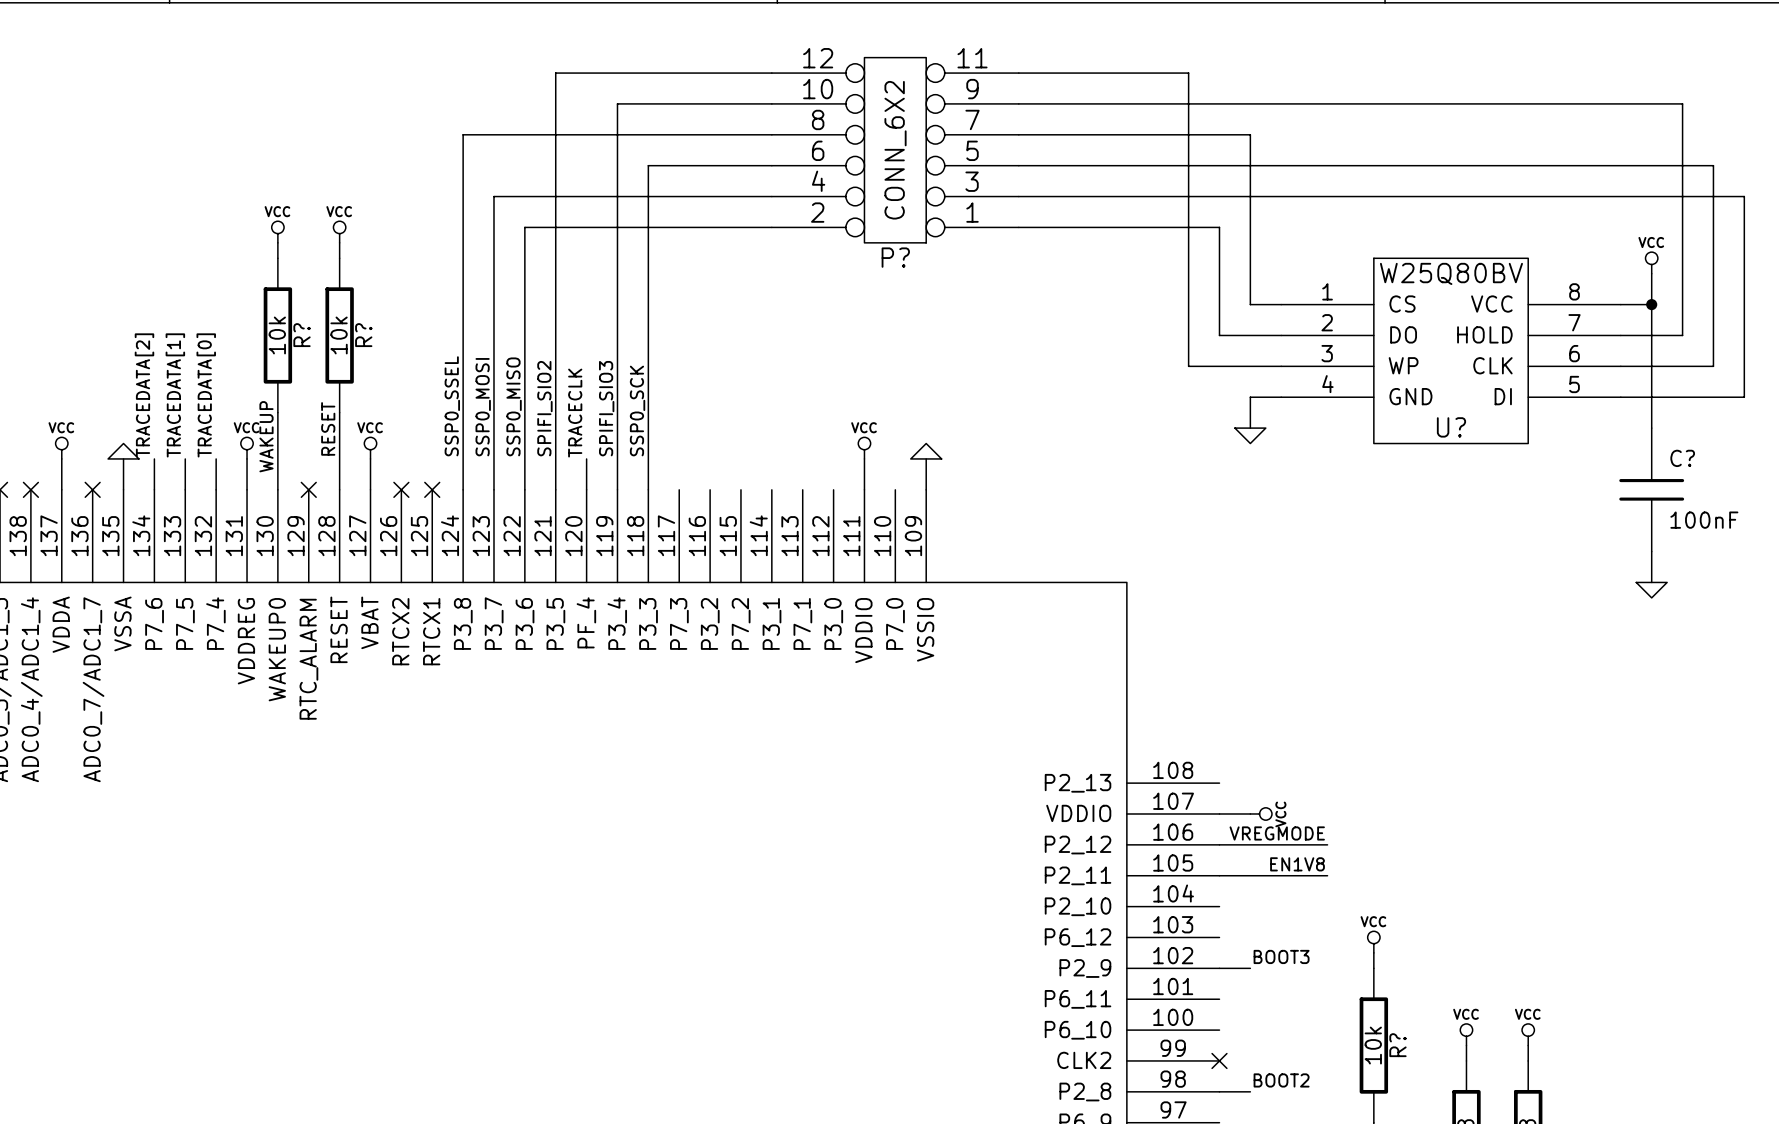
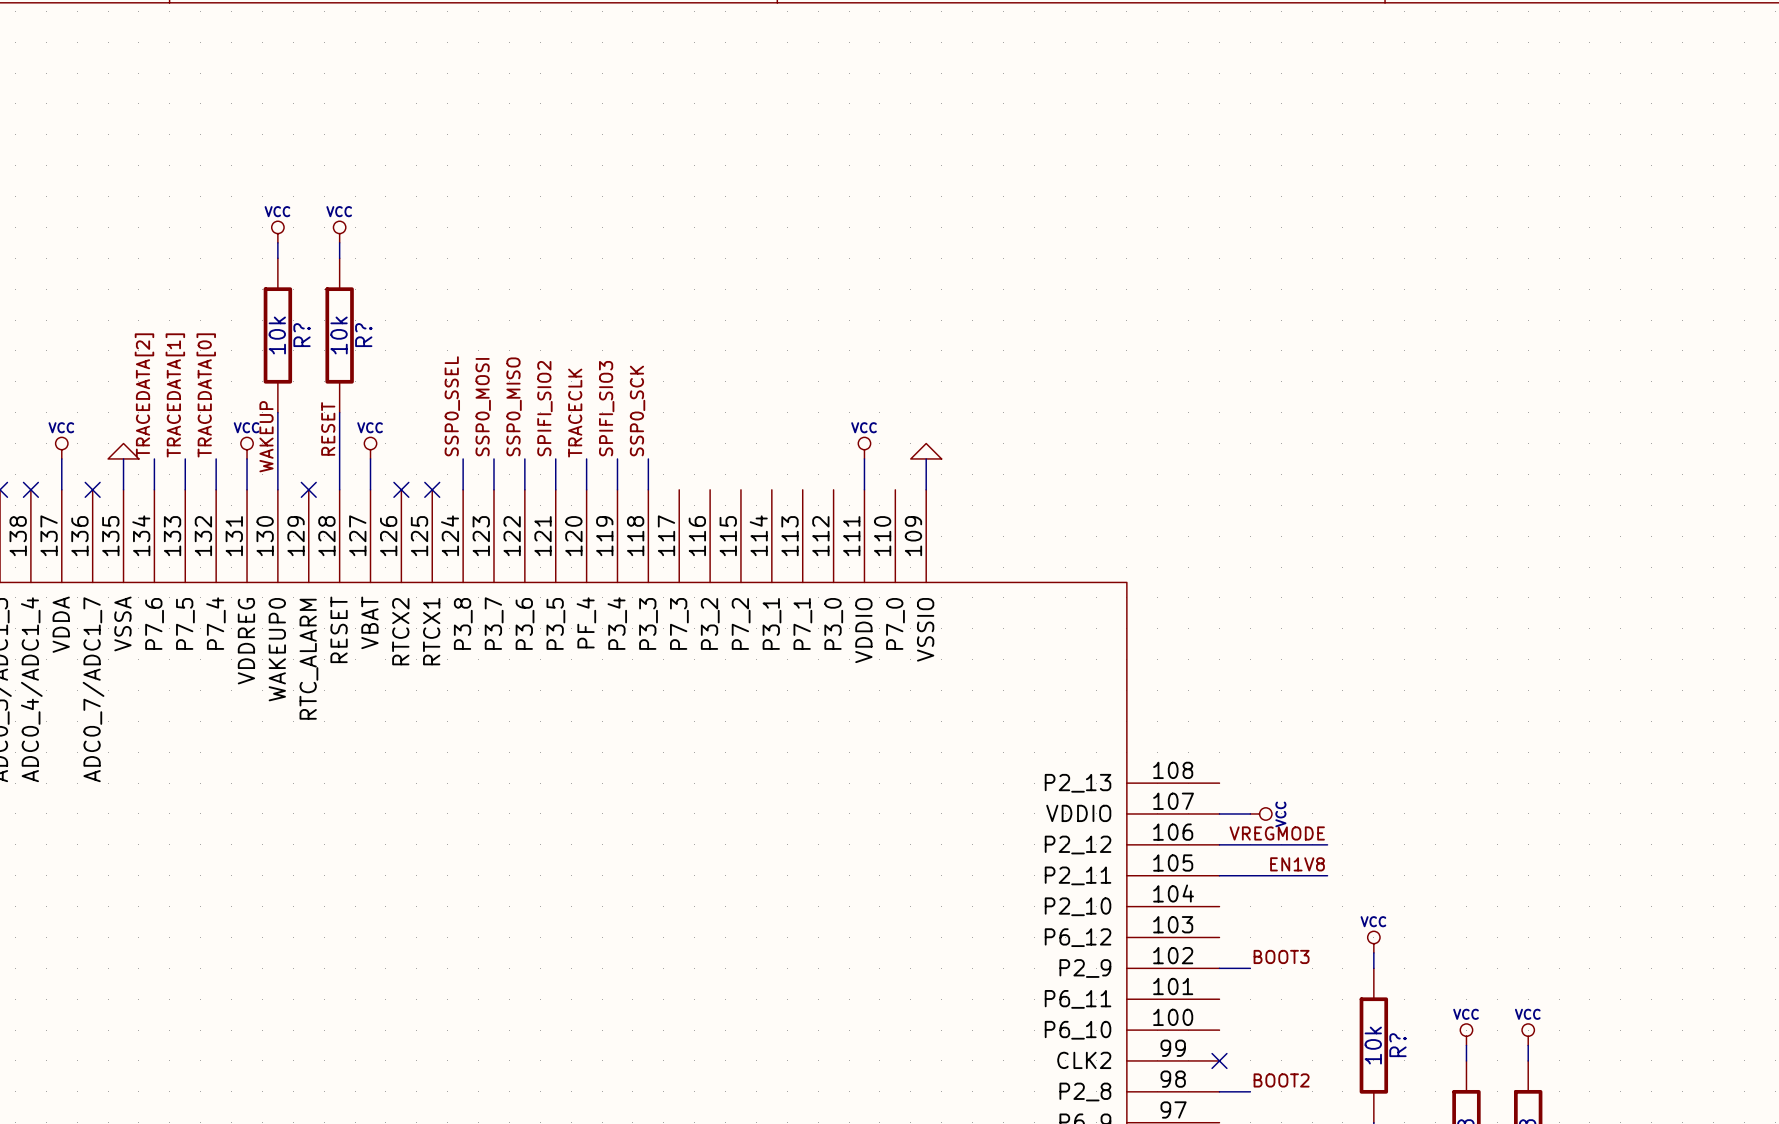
wire: (771, 73) (555, 73) (555, 458) -> none
wire: (1018, 73) (1188, 73) (1188, 366) (1281, 366) -> none
wire: (771, 103) (617, 103) (617, 458) -> none
wire: (1018, 103) (1682, 103) (1682, 335) (1620, 335) -> none
wire: (771, 134) (463, 134) (463, 458) -> none
wire: (1018, 134) (1250, 134) (1250, 304) (1281, 304) -> none
P?: CONN_6X2 (895, 150) -> none
wire: (771, 165) (648, 165) (648, 458) -> none
wire: (1018, 165) (1713, 165) (1713, 366) (1620, 366) -> none
wire: (771, 196) (493, 196) (493, 458) -> none
wire: (1018, 196) (1744, 196) (1744, 397) (1620, 397) -> none
wire: (771, 227) (524, 227) (524, 458) -> none
wire: (1018, 227) (1219, 227) (1219, 335) (1281, 335) -> none
power symbol: VCC (1651, 262) -> none
wire: (1651, 273) (1651, 428) -> none
wire: (1620, 304) (1651, 304) -> none
junction: (1651, 304) -> none
U?: W25Q80BV (1451, 350) -> none
wire: (1281, 397) (1250, 397) (1250, 428) -> none
power symbol: (1250, 435) -> none
C?: 100nF (1651, 489) -> none
wire: (1651, 551) (1651, 582) -> none
power symbol: (1651, 590) -> none

